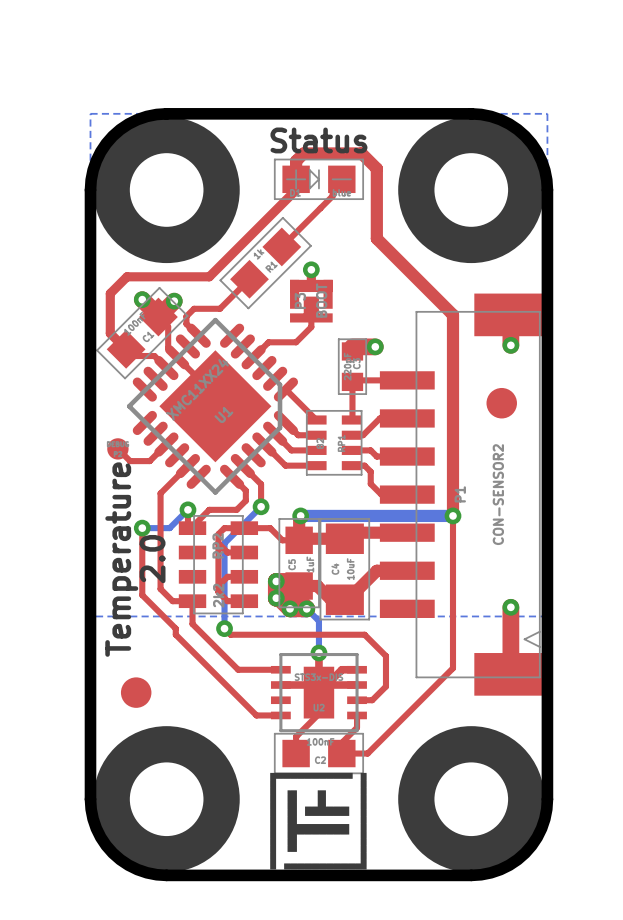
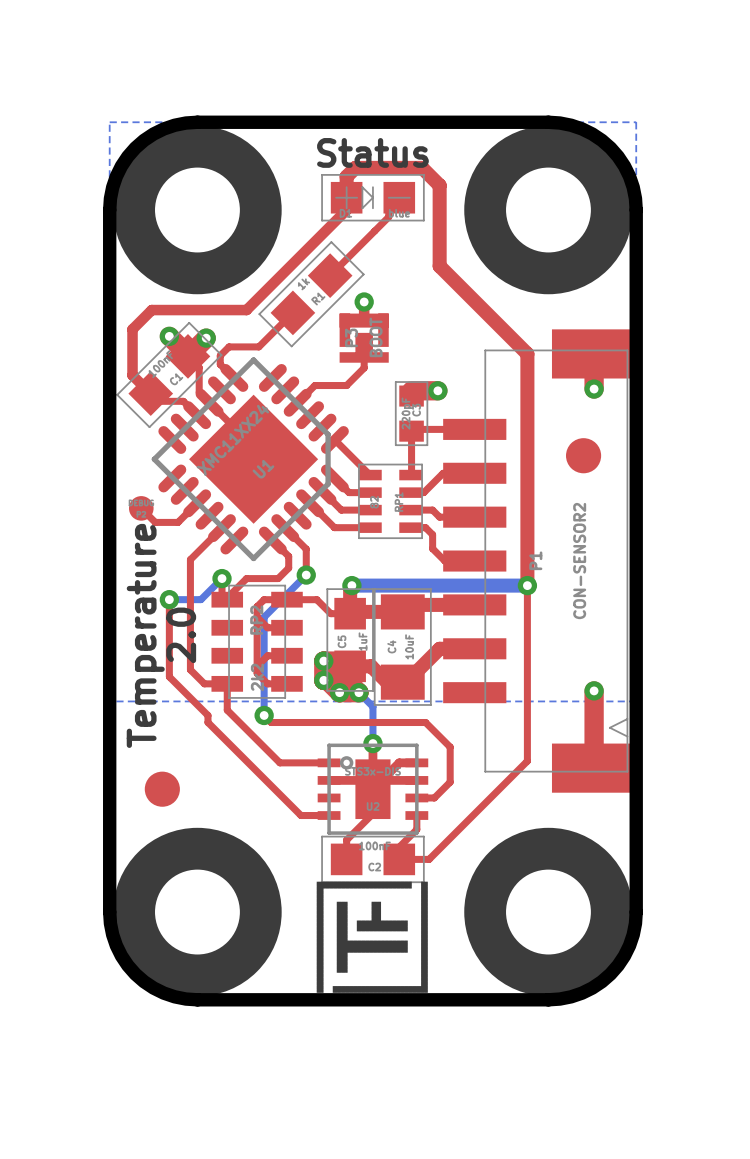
part footprint: [270, 653, 367, 733] -> [317, 743, 429, 835]

